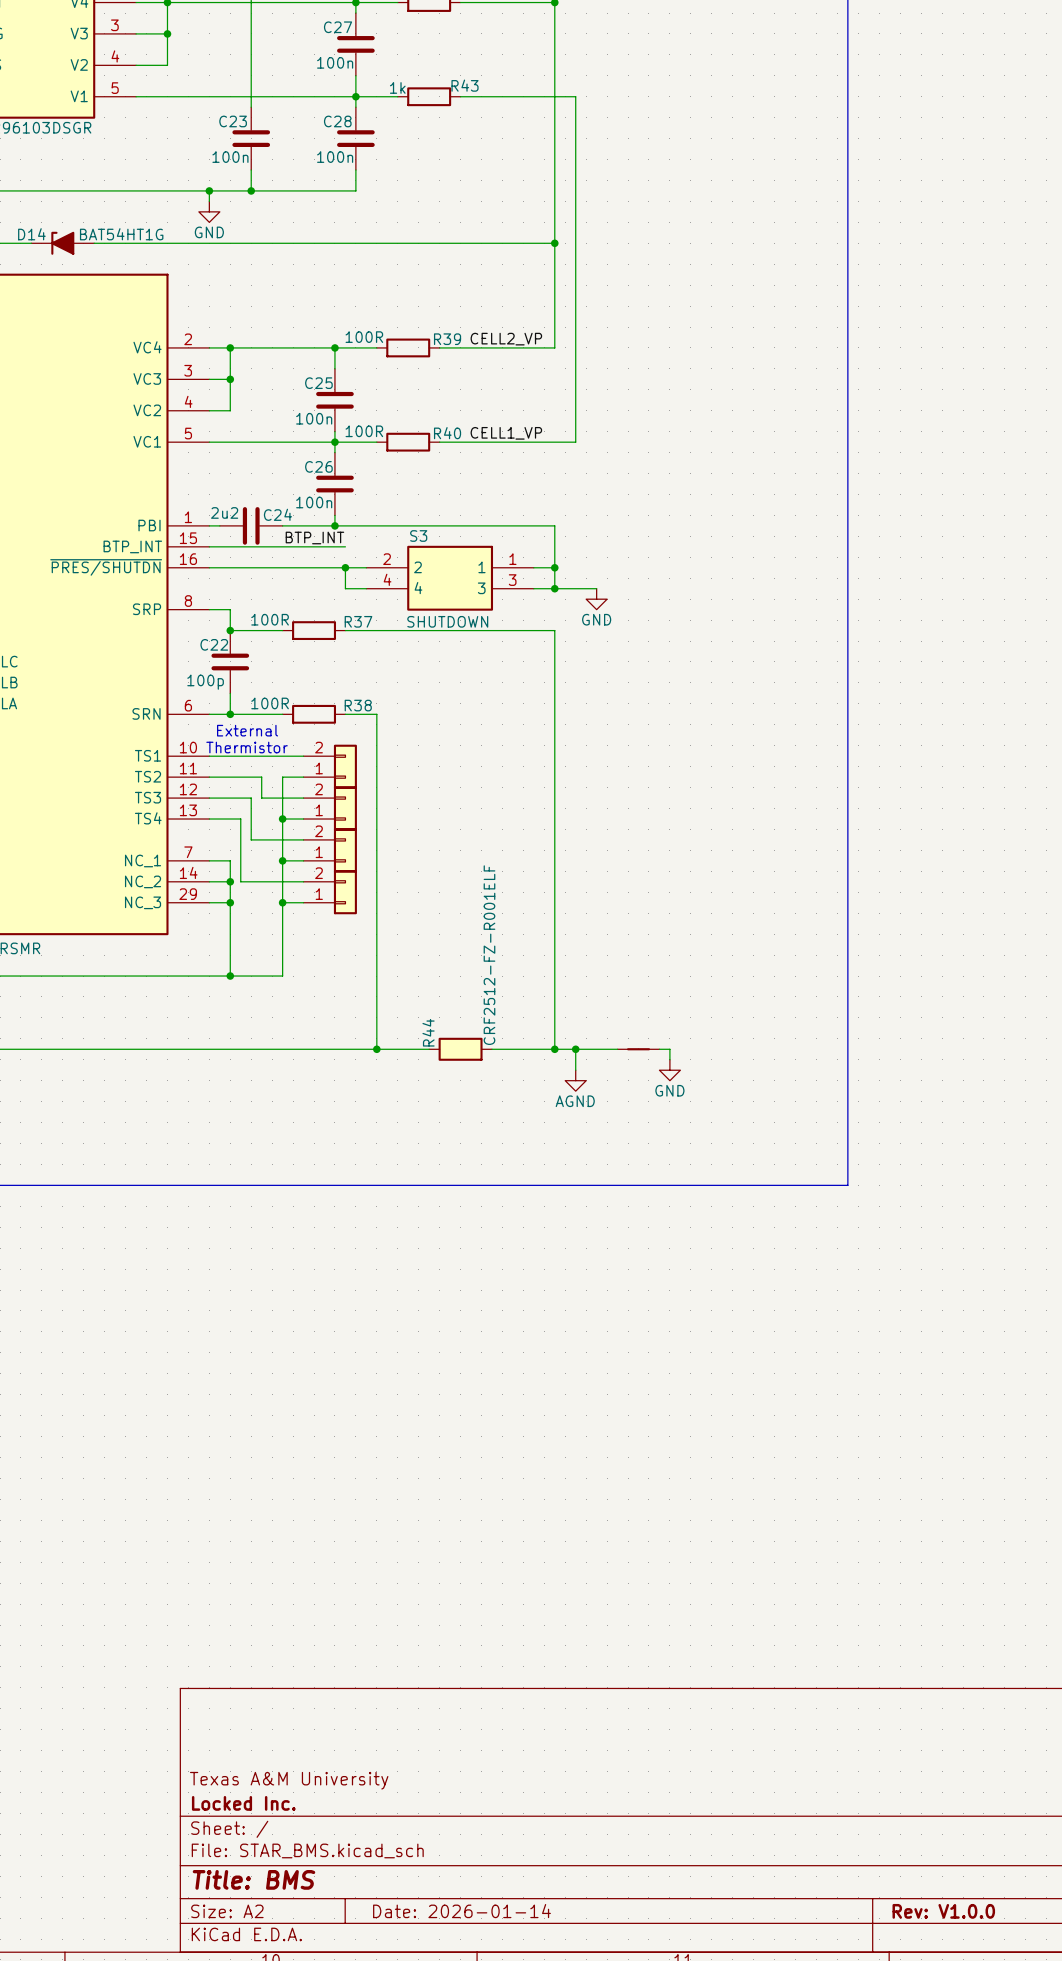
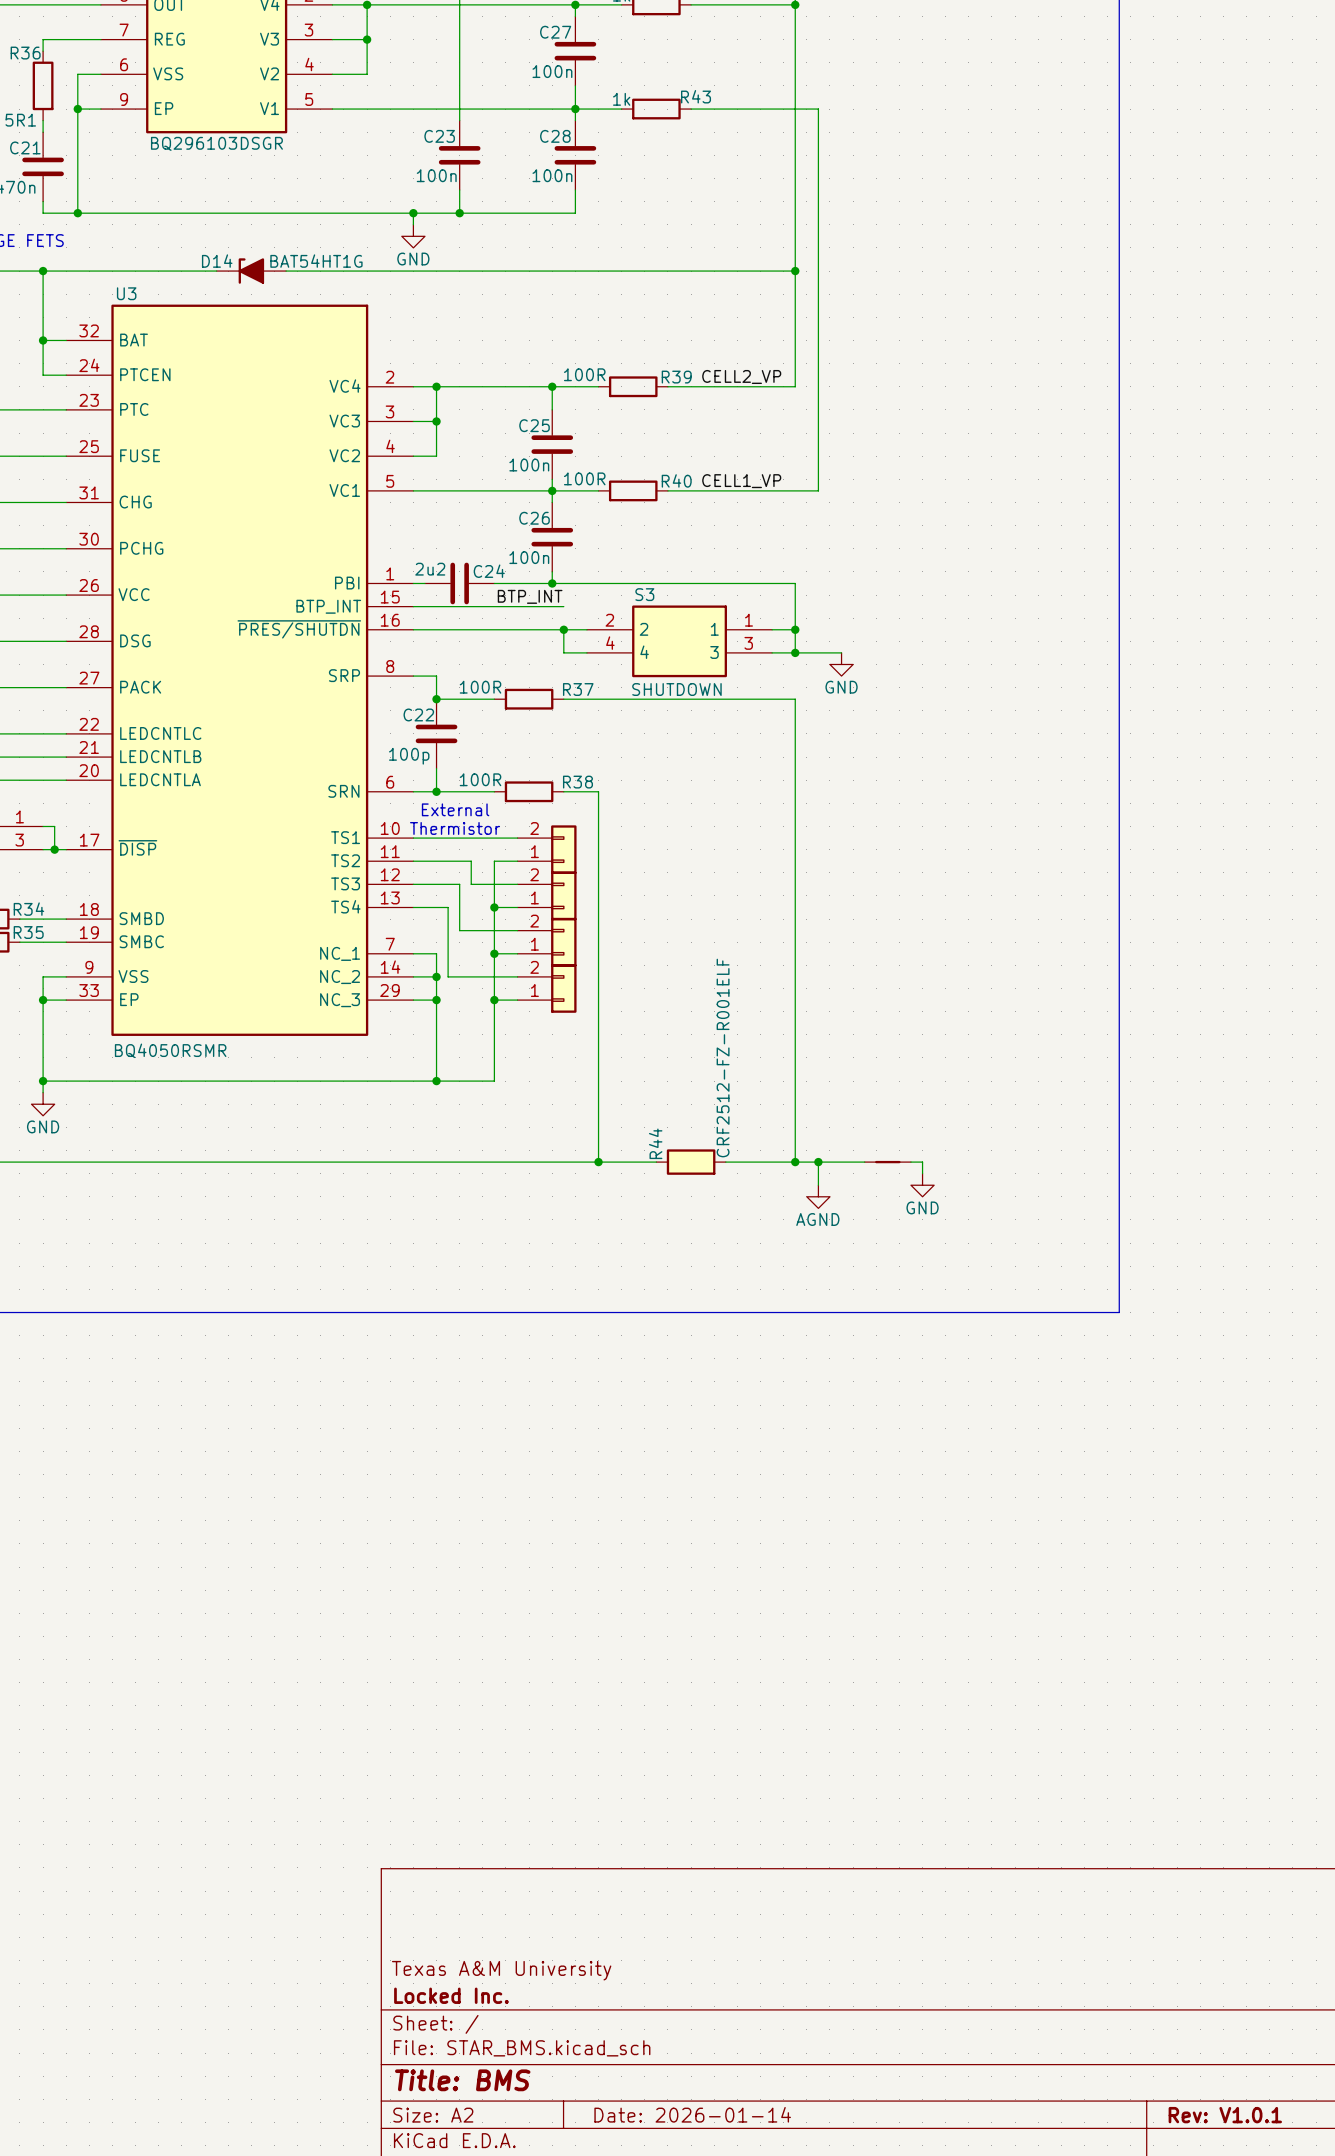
title block: Rev: V1.0.0 (943, 1911) -> Rev: V1.0.1 (1225, 2115)

